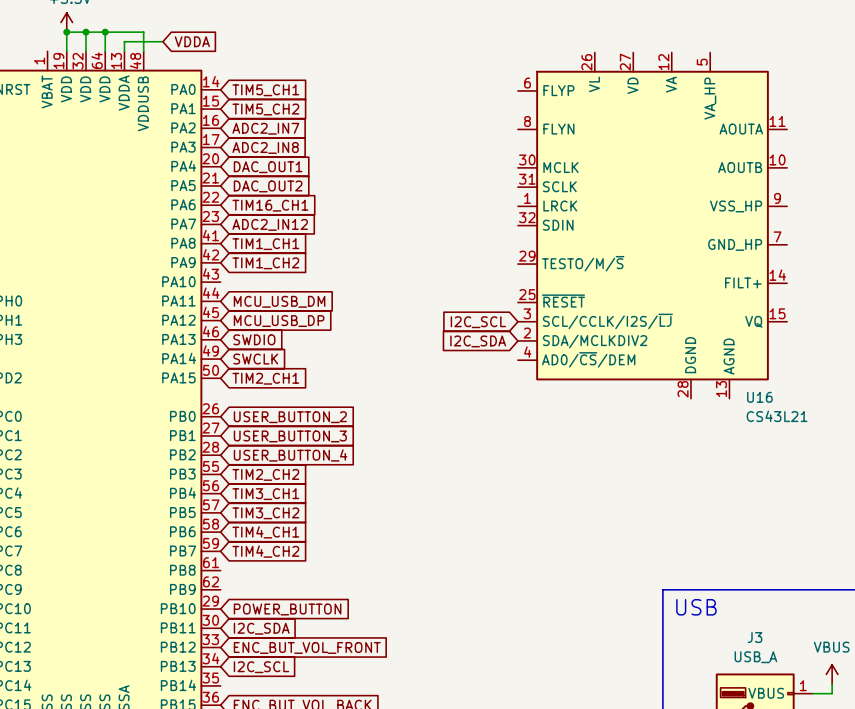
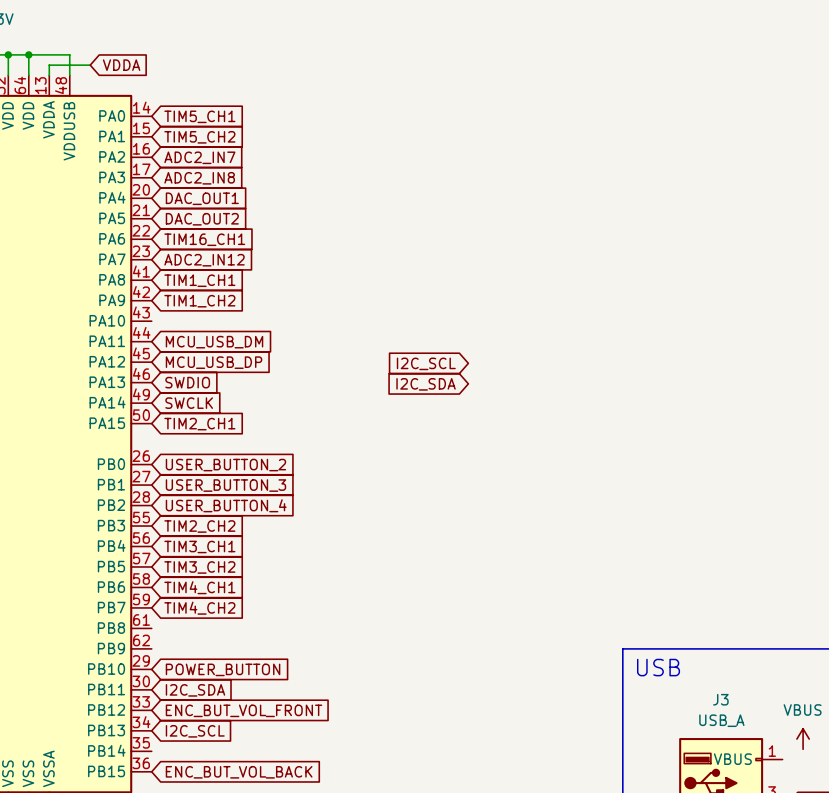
U16: CS43L21 (652, 225) -> none
wire: (832, 684) (832, 693) (812, 693) -> none

